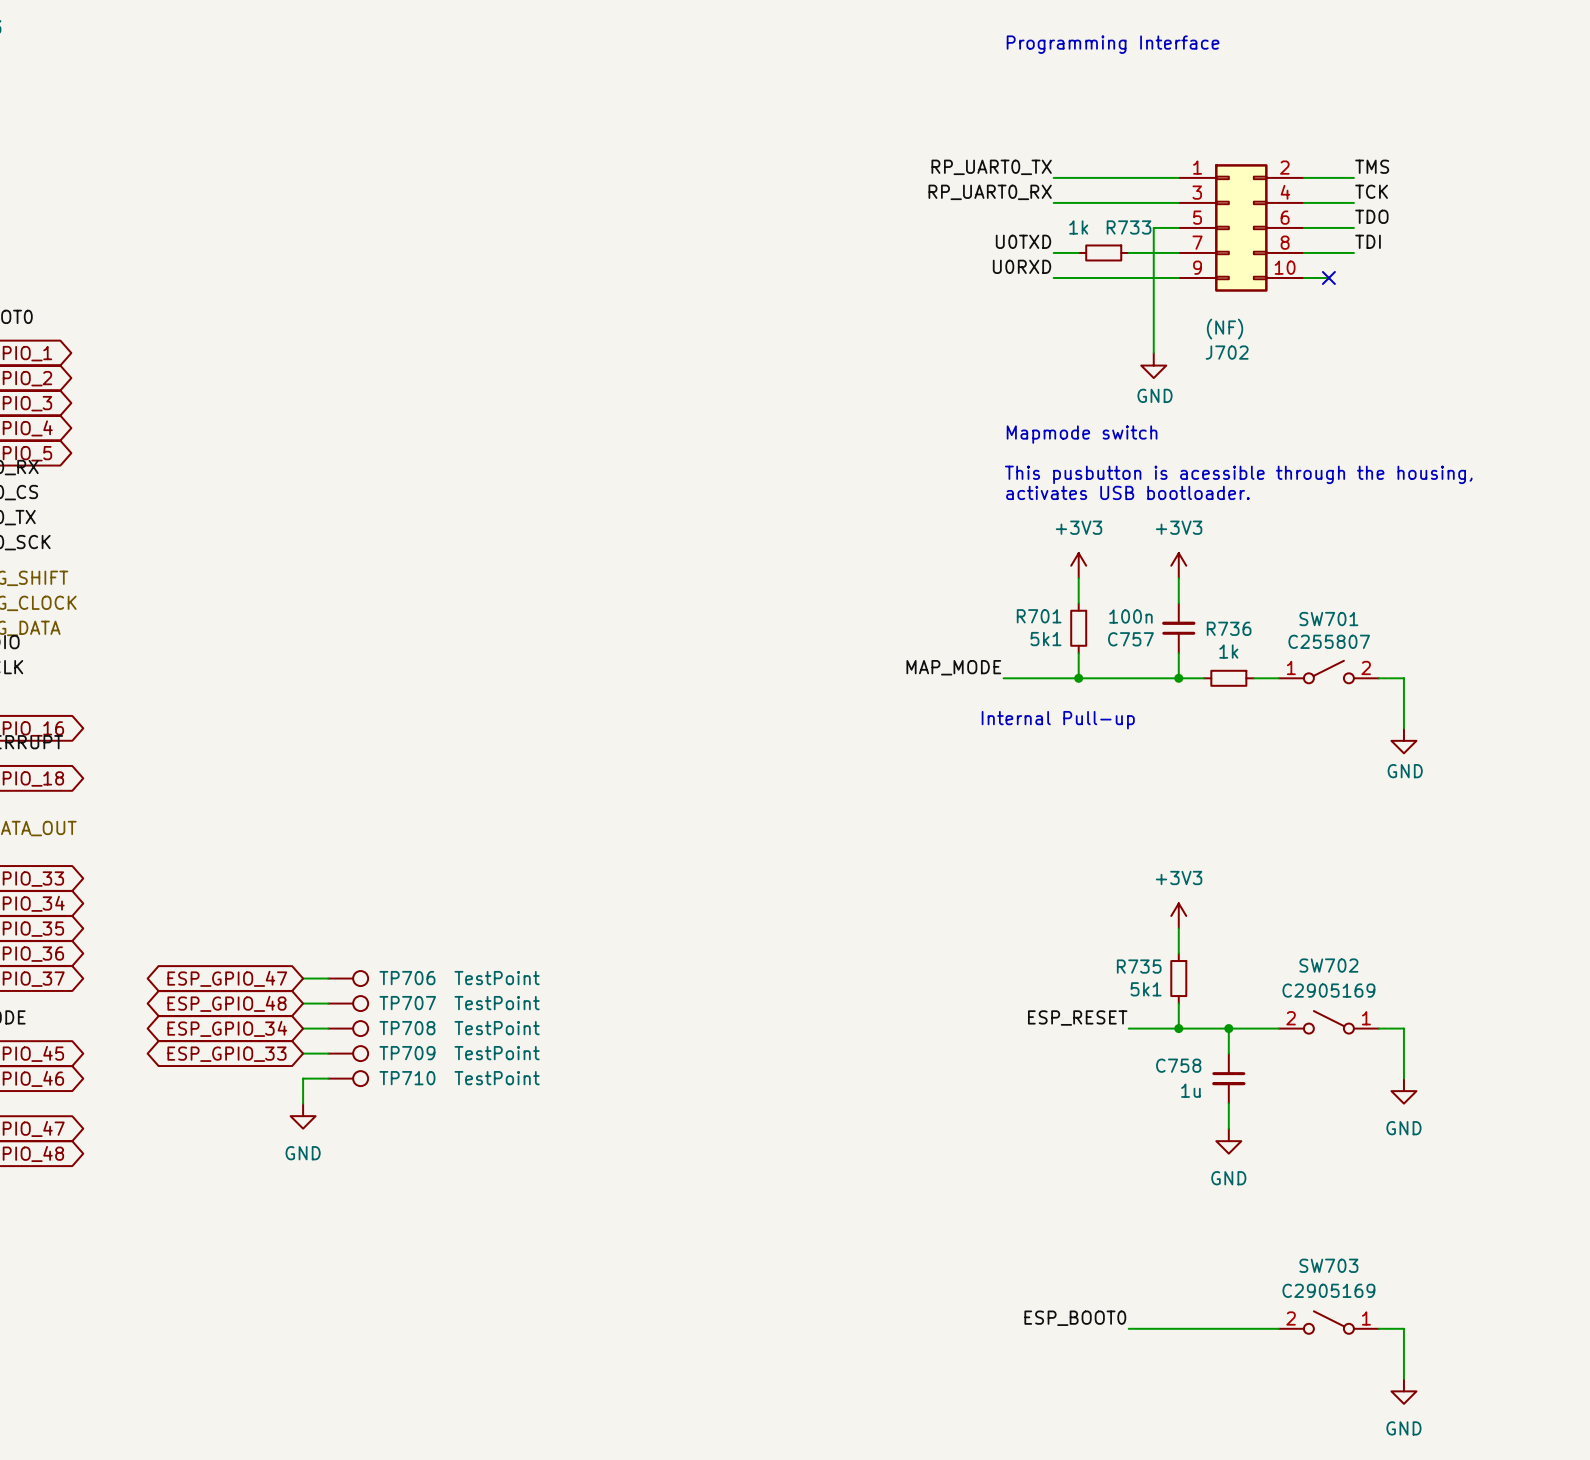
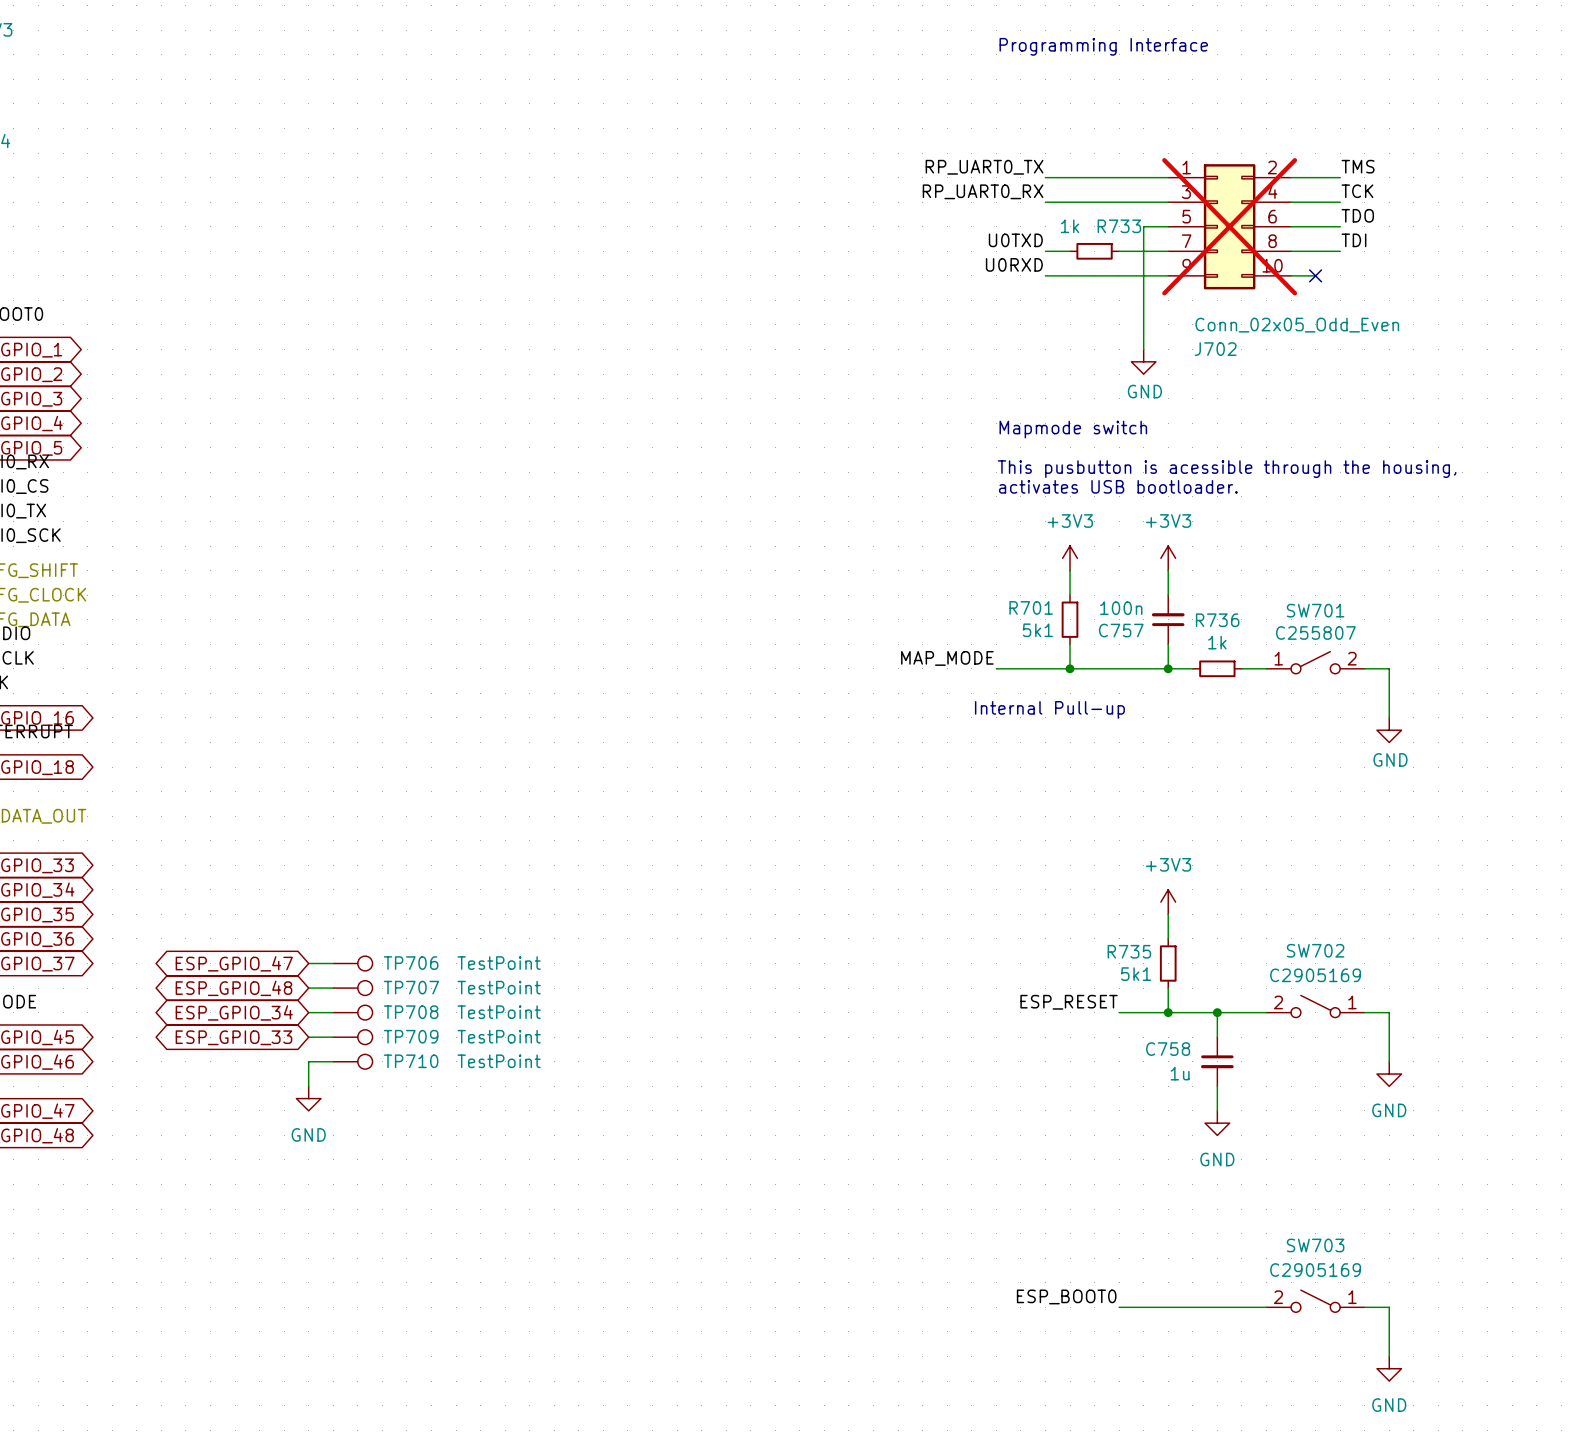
J702 do-not-place cross: none -> (1229, 226)
J702 value: (NF) (1225, 329) -> Conn_02x05_Odd_Even (1297, 325)

